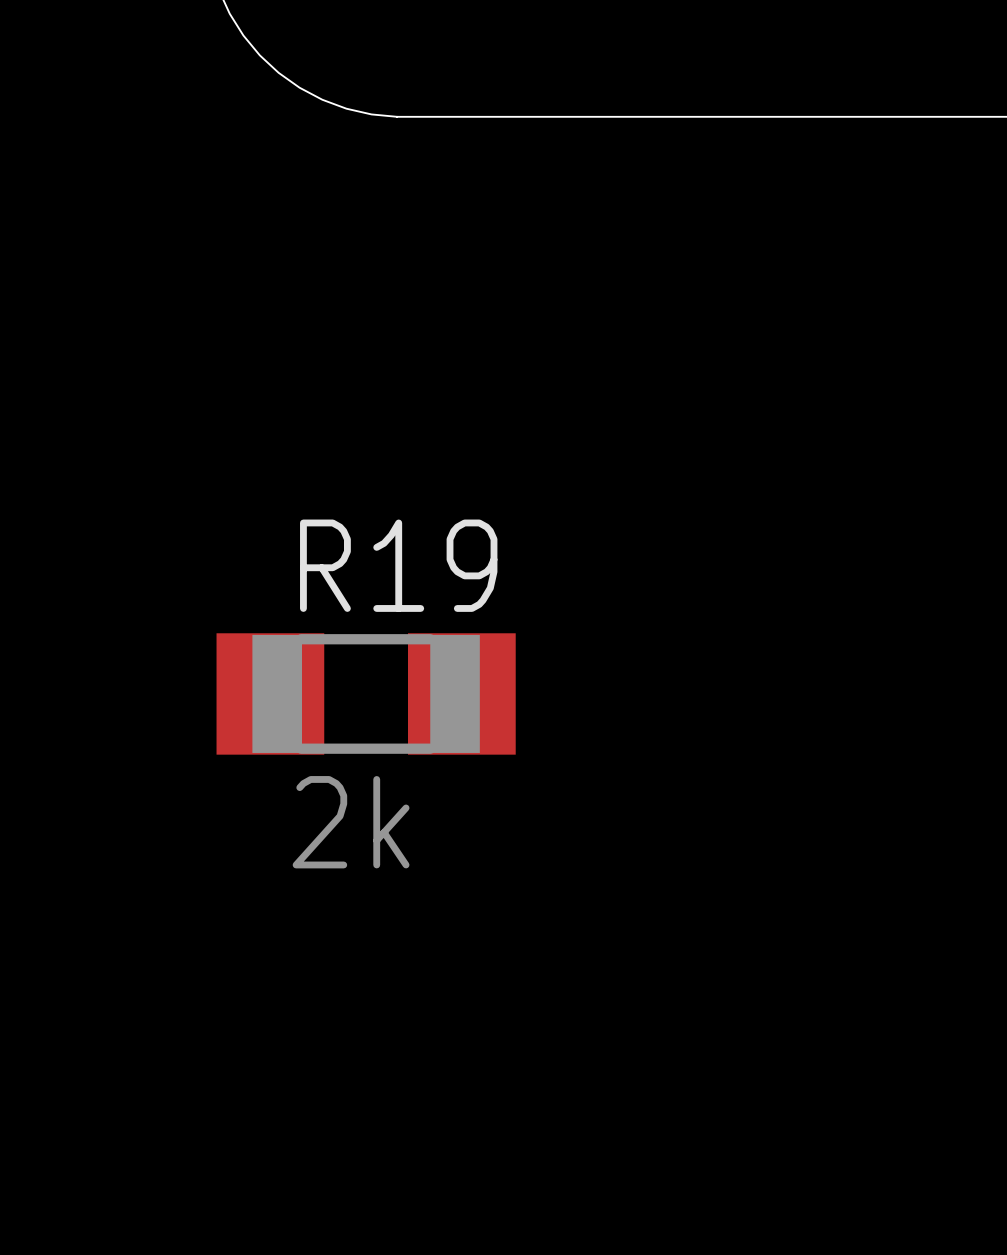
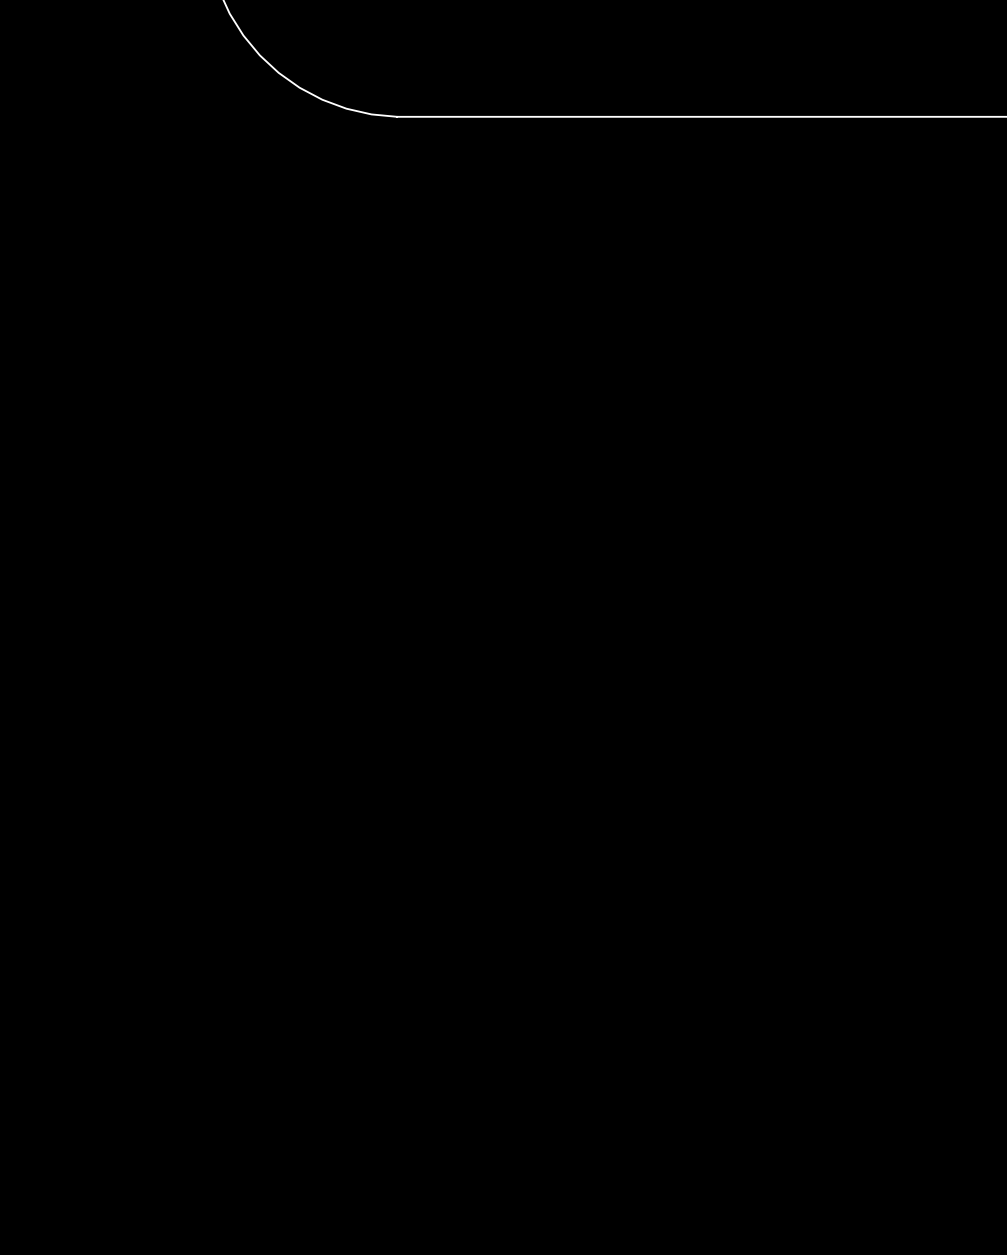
R19: 2k (366, 693) -> none

